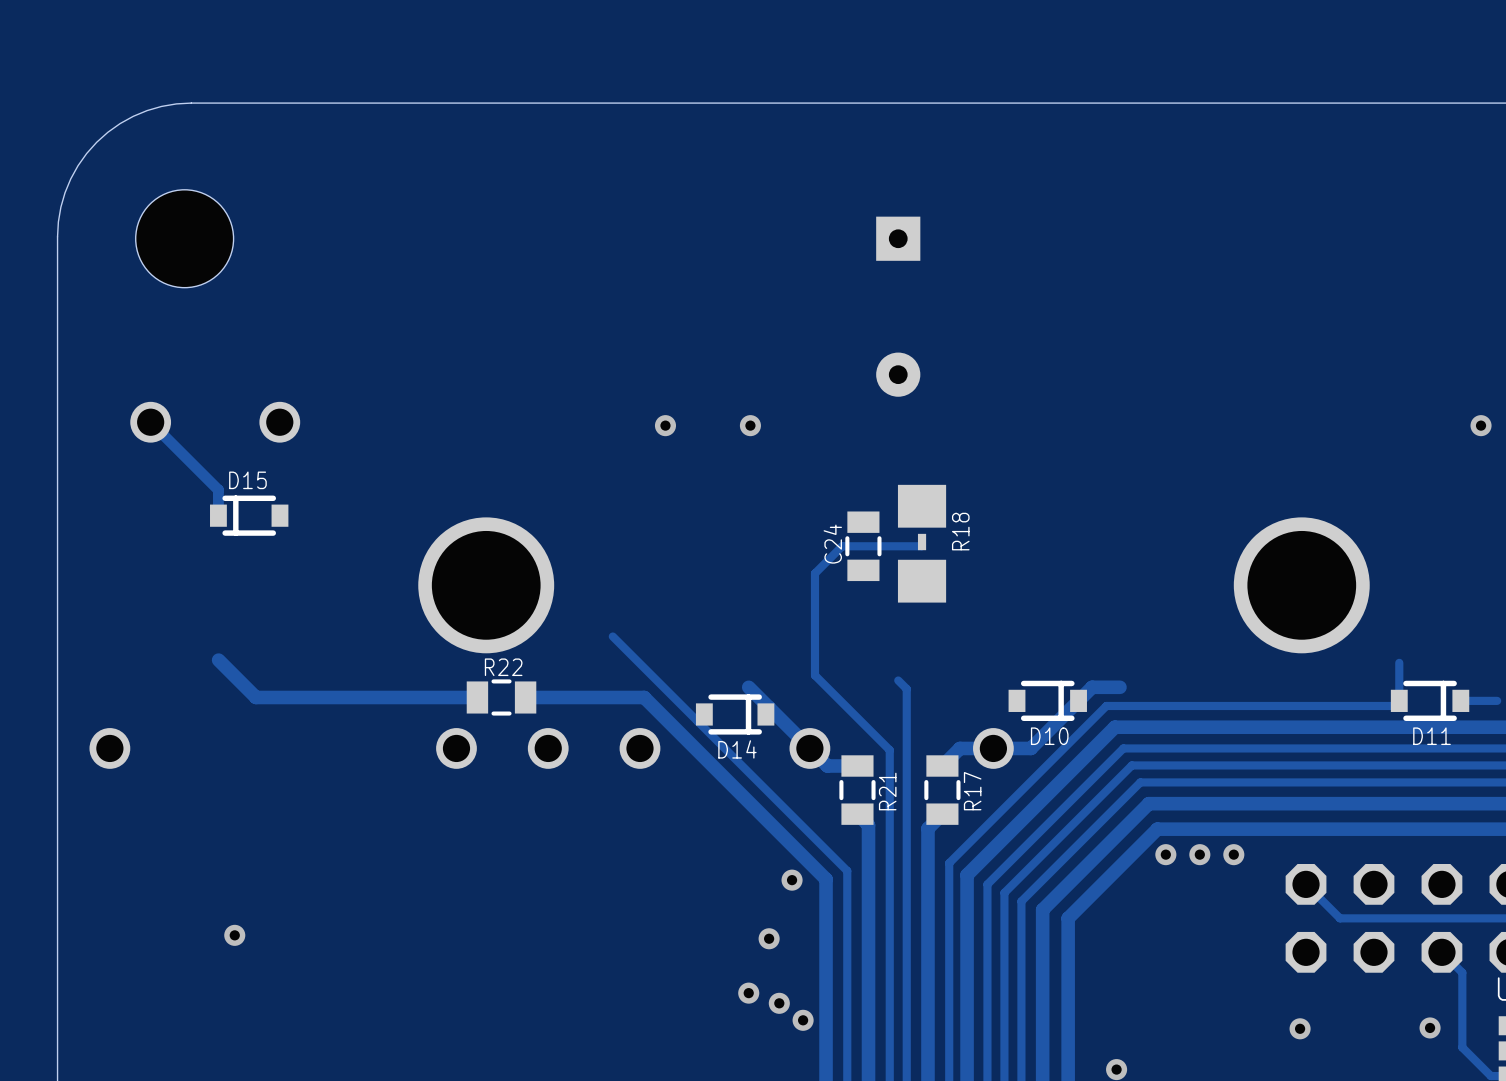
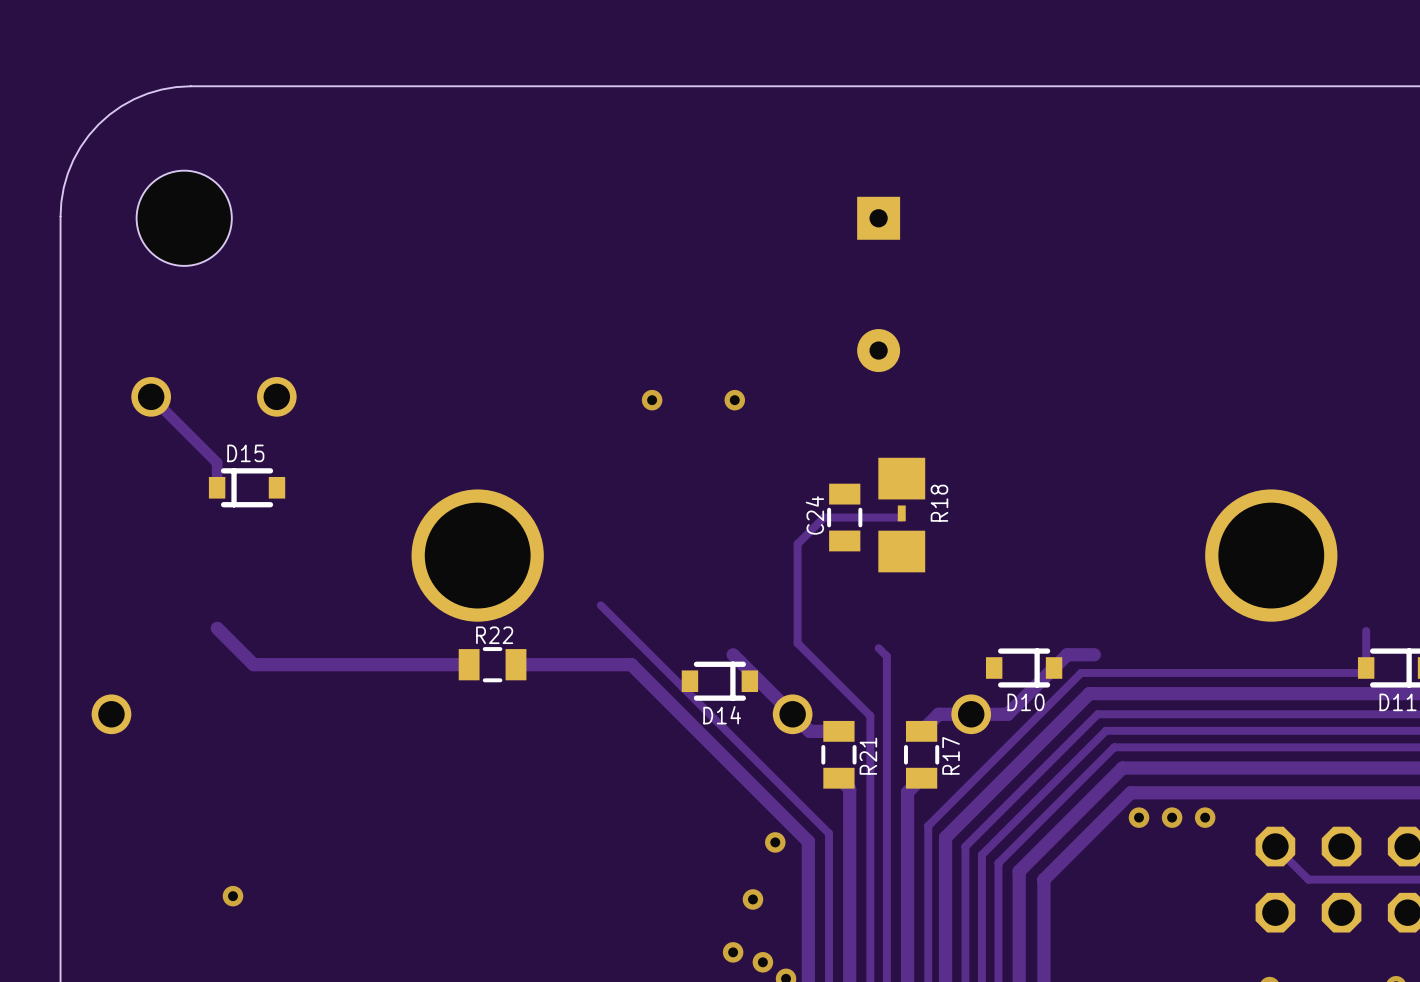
part: (456, 748) -> none
part: (548, 748) -> none
part: (639, 748) -> none

